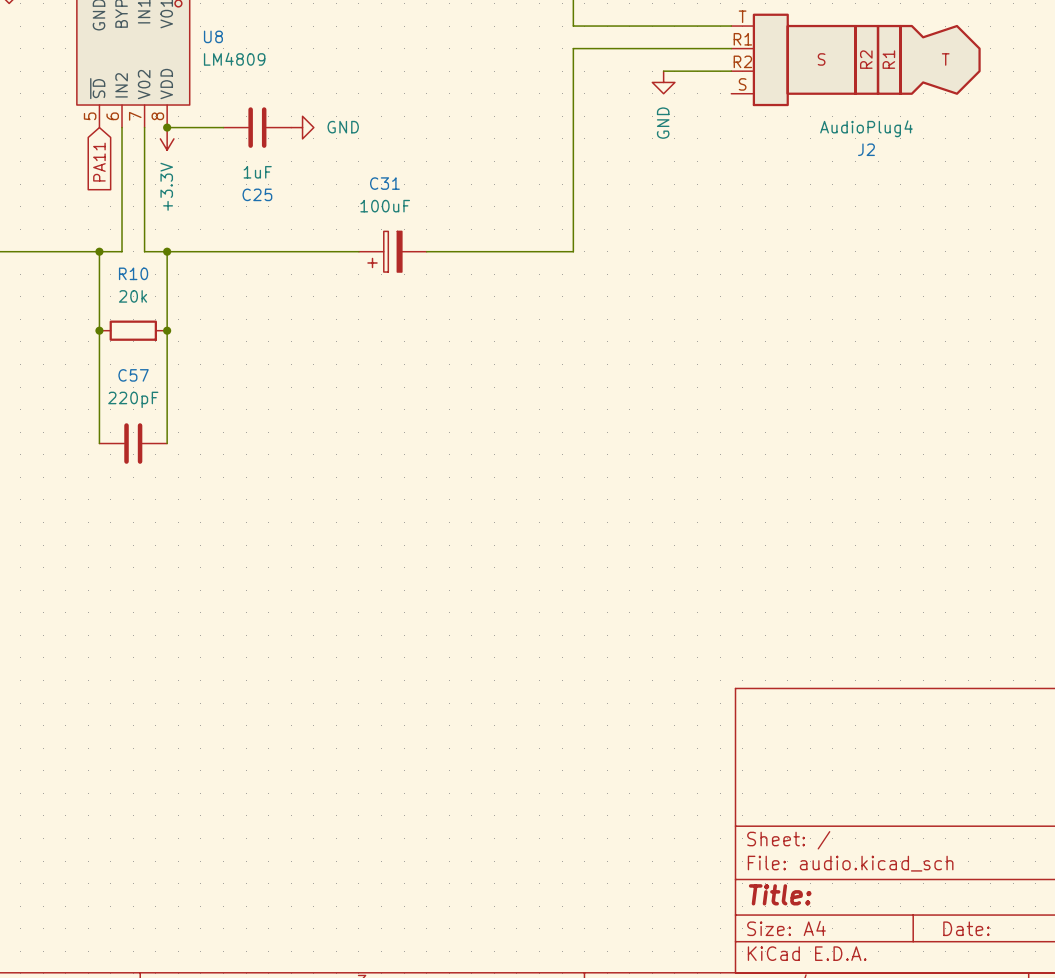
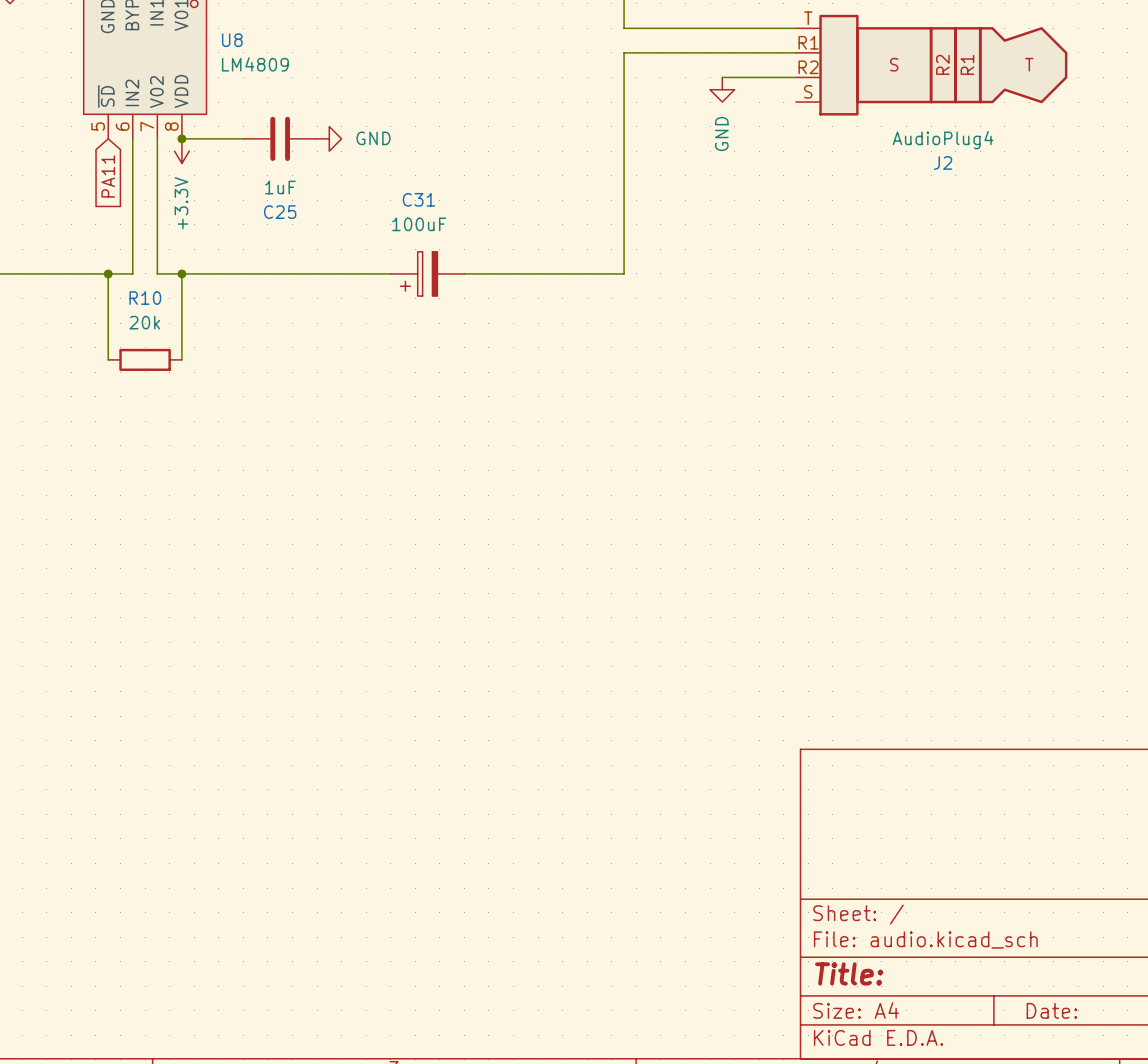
wire: (99, 330) (99, 443) -> none
junction: (99, 330) -> none
wire: (167, 330) (167, 443) -> none
junction: (167, 330) -> none
C57: 220pF (133, 443) -> none

